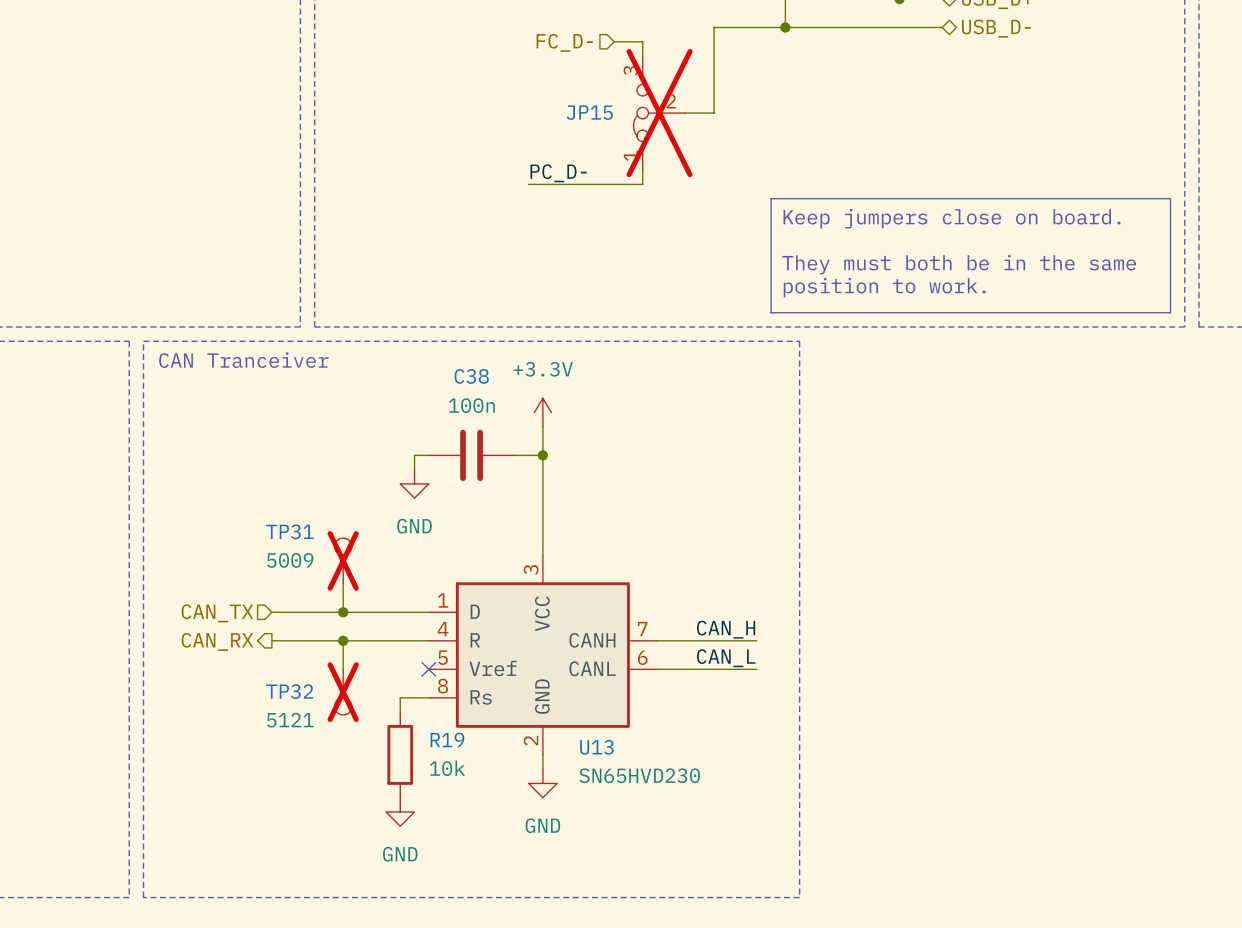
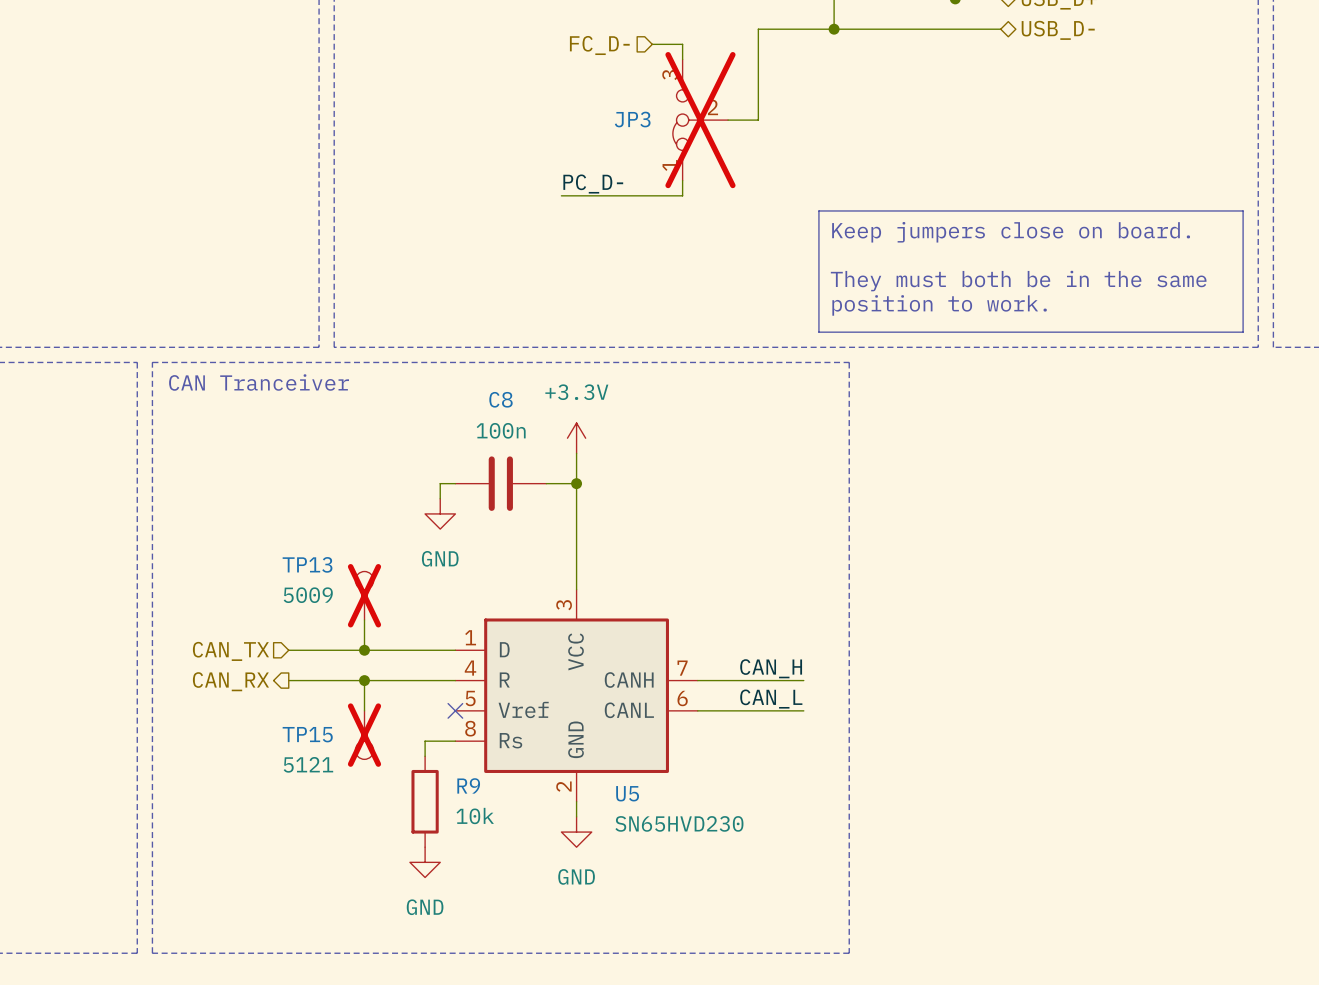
JP15 name: JP15 (589, 112) -> JP3 (632, 119)
C38 name: C38 (471, 376) -> C8 (500, 399)
TP31 name: TP31 (289, 531) -> TP13 (307, 564)
TP32 name: TP32 (289, 691) -> TP15 (307, 734)
R19 name: R19 (447, 740) -> R9 (468, 785)
U13 name: U13 (596, 747) -> U5 (627, 793)

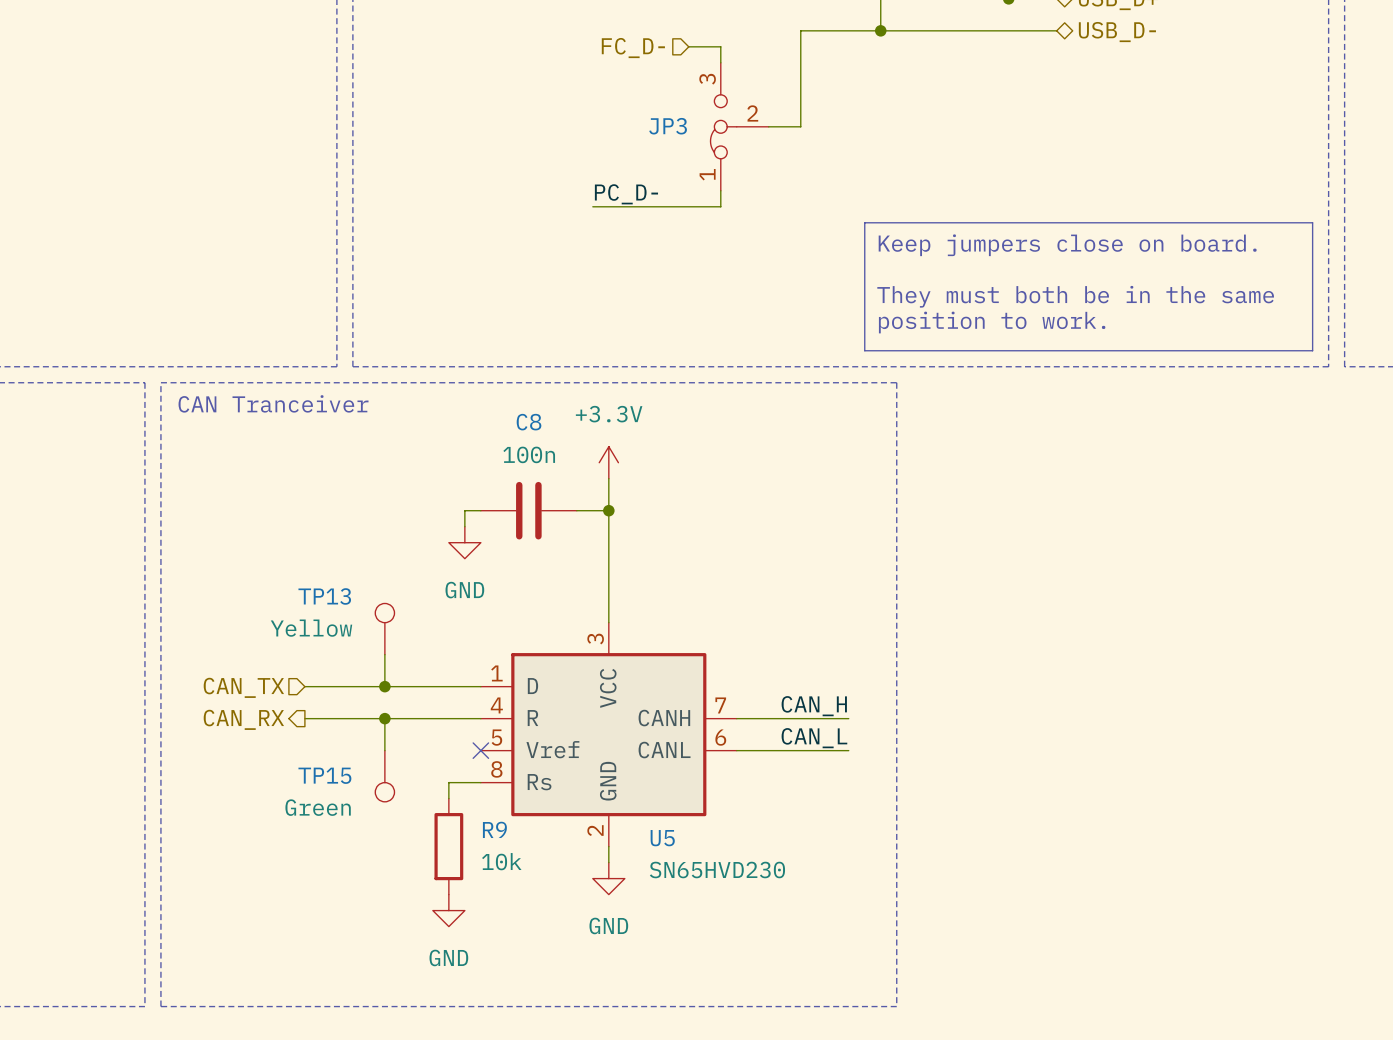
JP3 do-not-place cross: (700, 120) -> none
TP13 value: 5009 (308, 595) -> Yellow (311, 628)
TP13 do-not-place cross: (364, 595) -> none
TP15 do-not-place cross: (364, 735) -> none
TP15 value: 5121 (308, 764) -> Green (318, 807)

